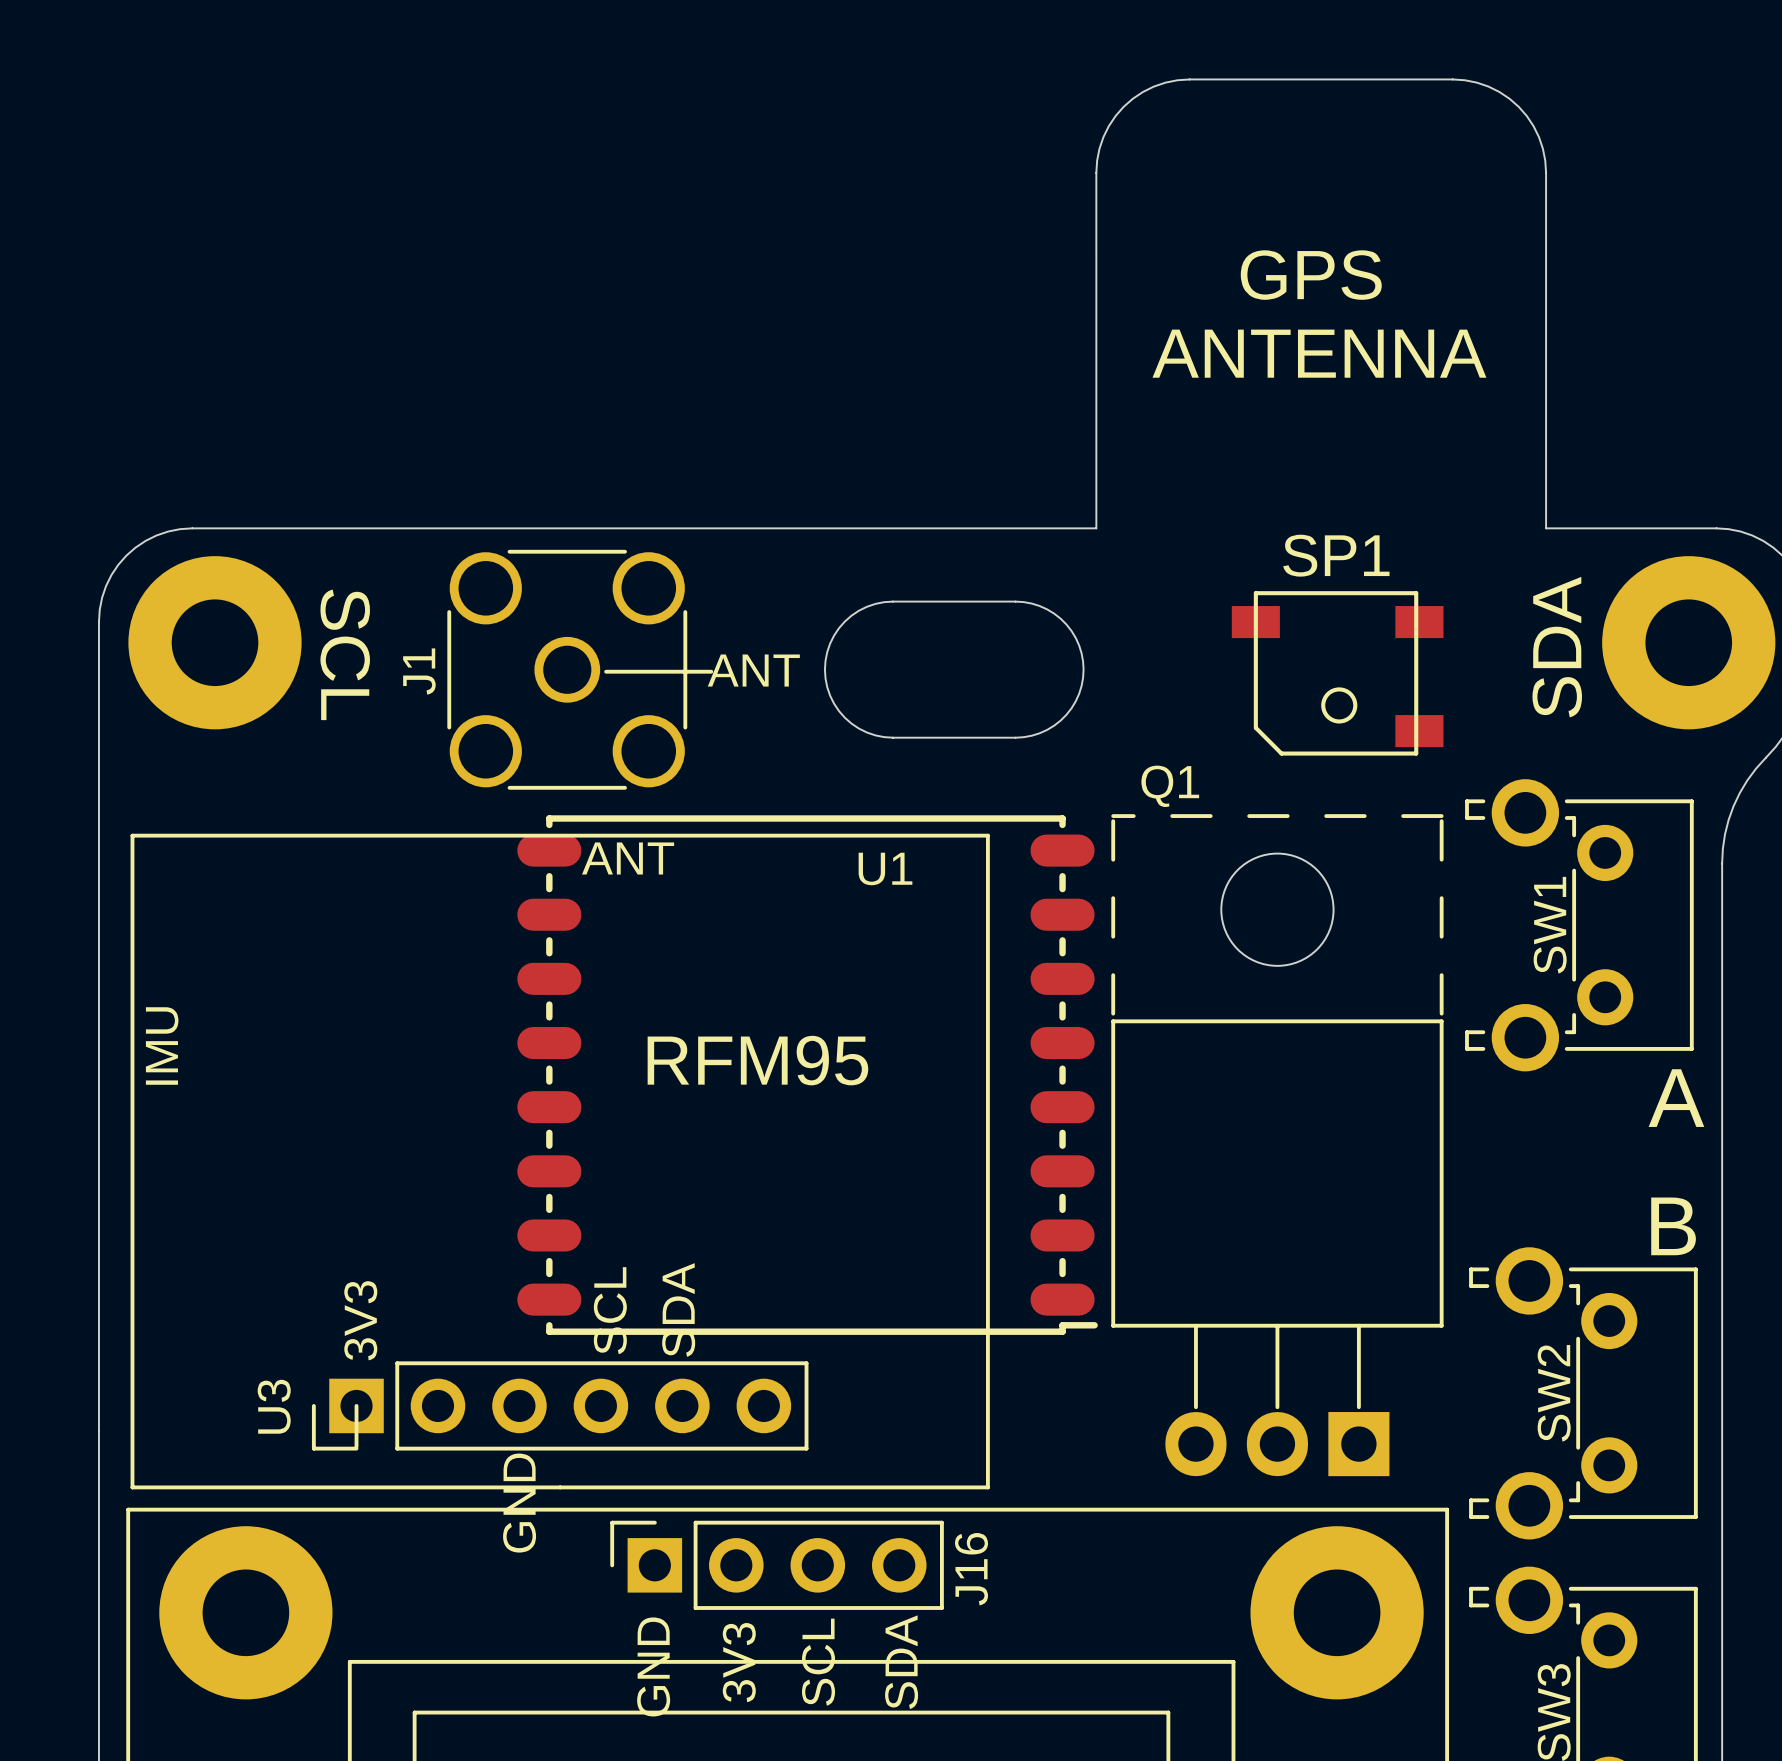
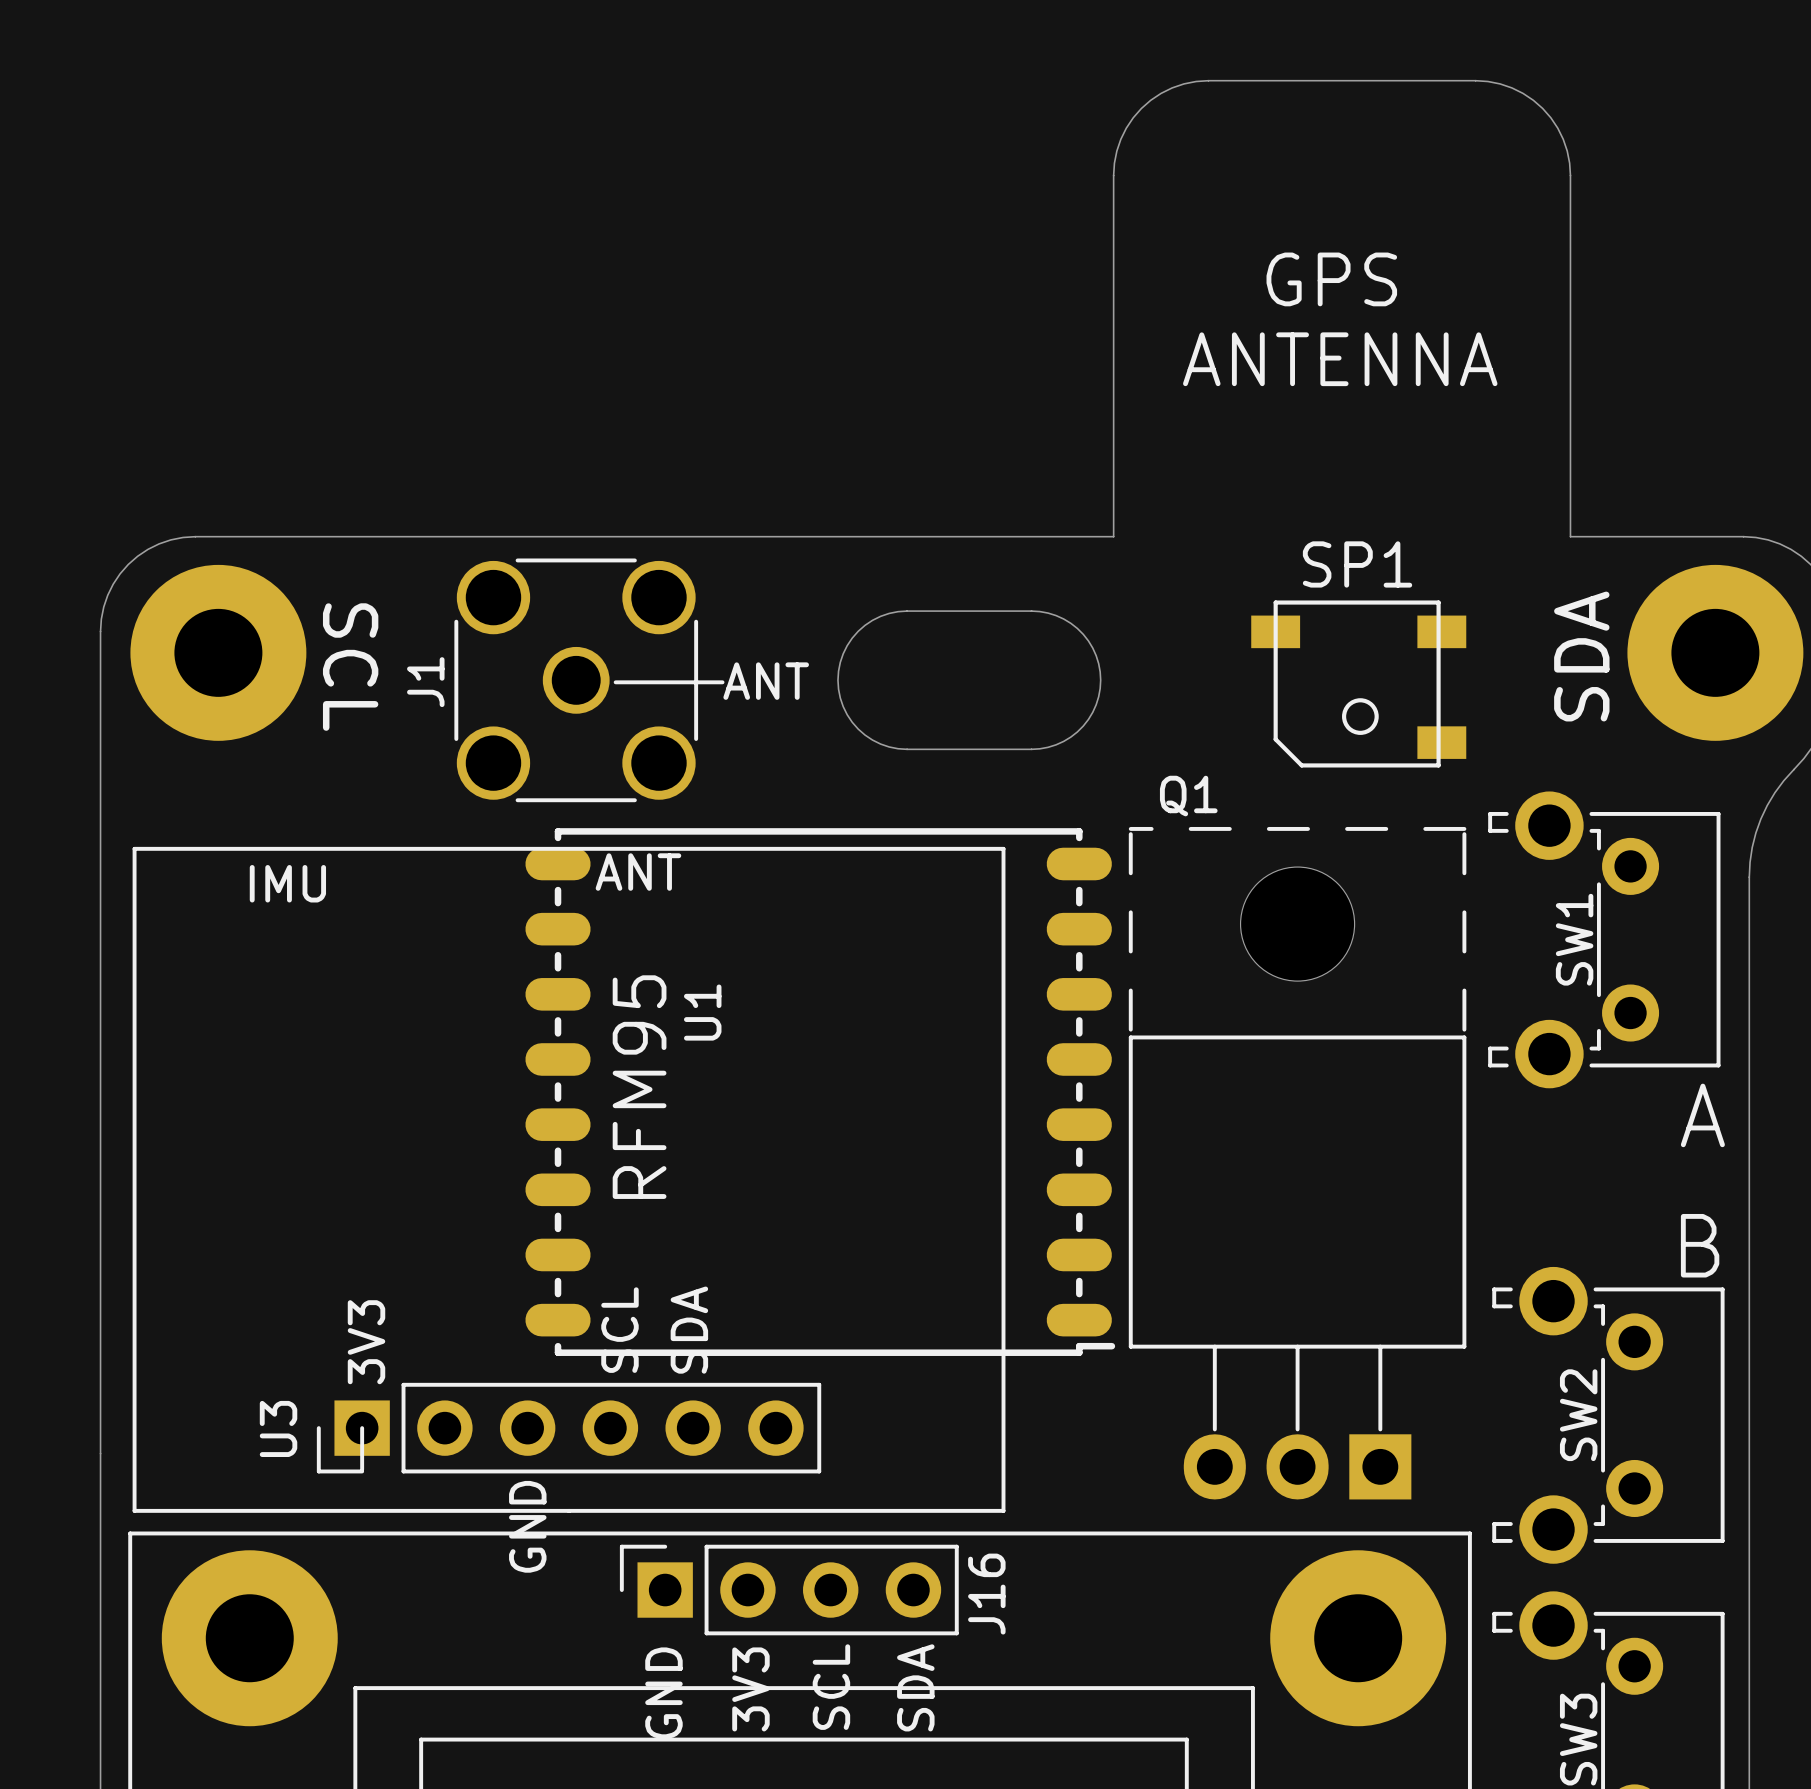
U1 name rotation: 0° (885, 868) -> 90° counterclockwise (702, 1012)
U1 name position: U1 (885, 868) -> U1 (702, 1012)
text rotation: 0° (162, 1046) -> 90° clockwise (287, 883)
text position: IMU (162, 1046) -> IMU (287, 883)
text rotation: 0° (757, 1060) -> 90° counterclockwise (639, 1087)

